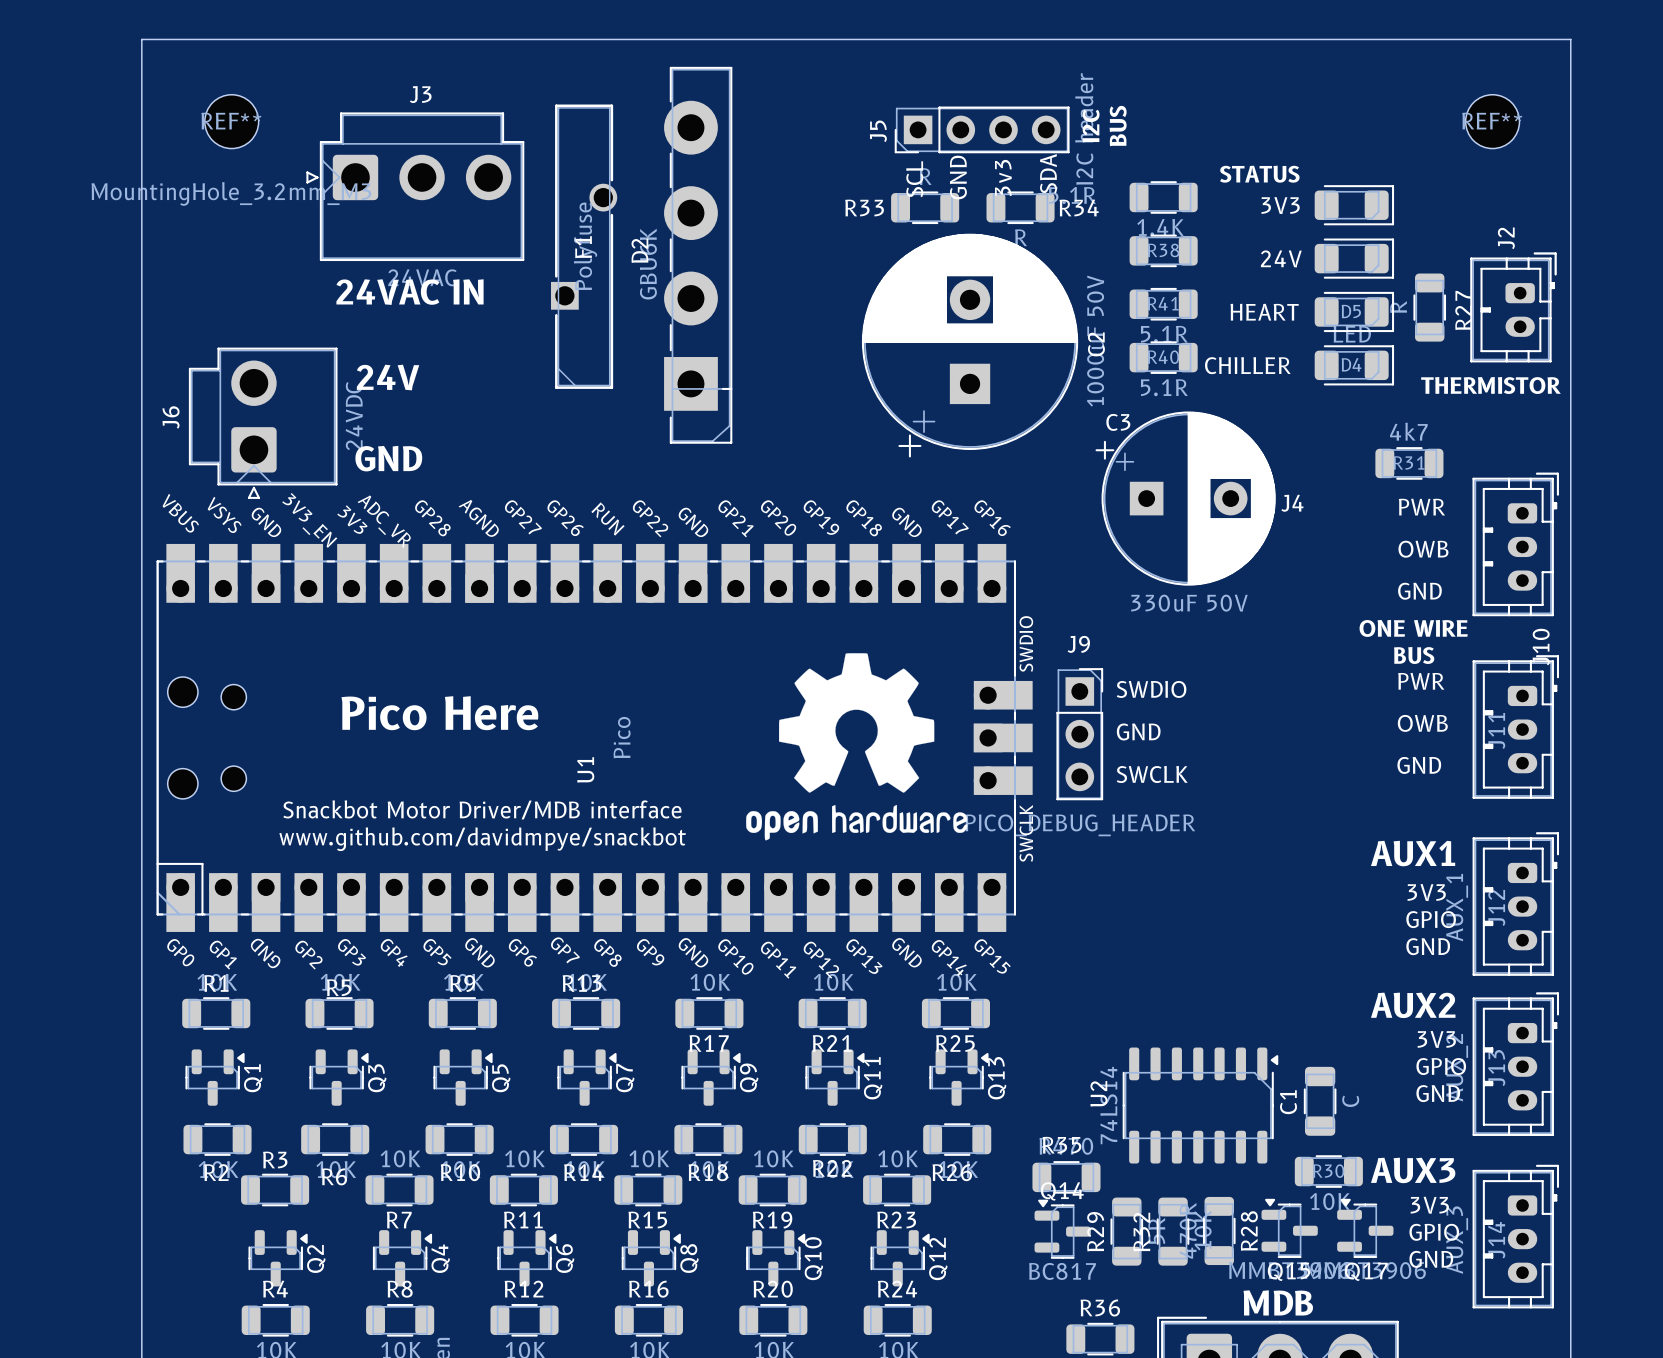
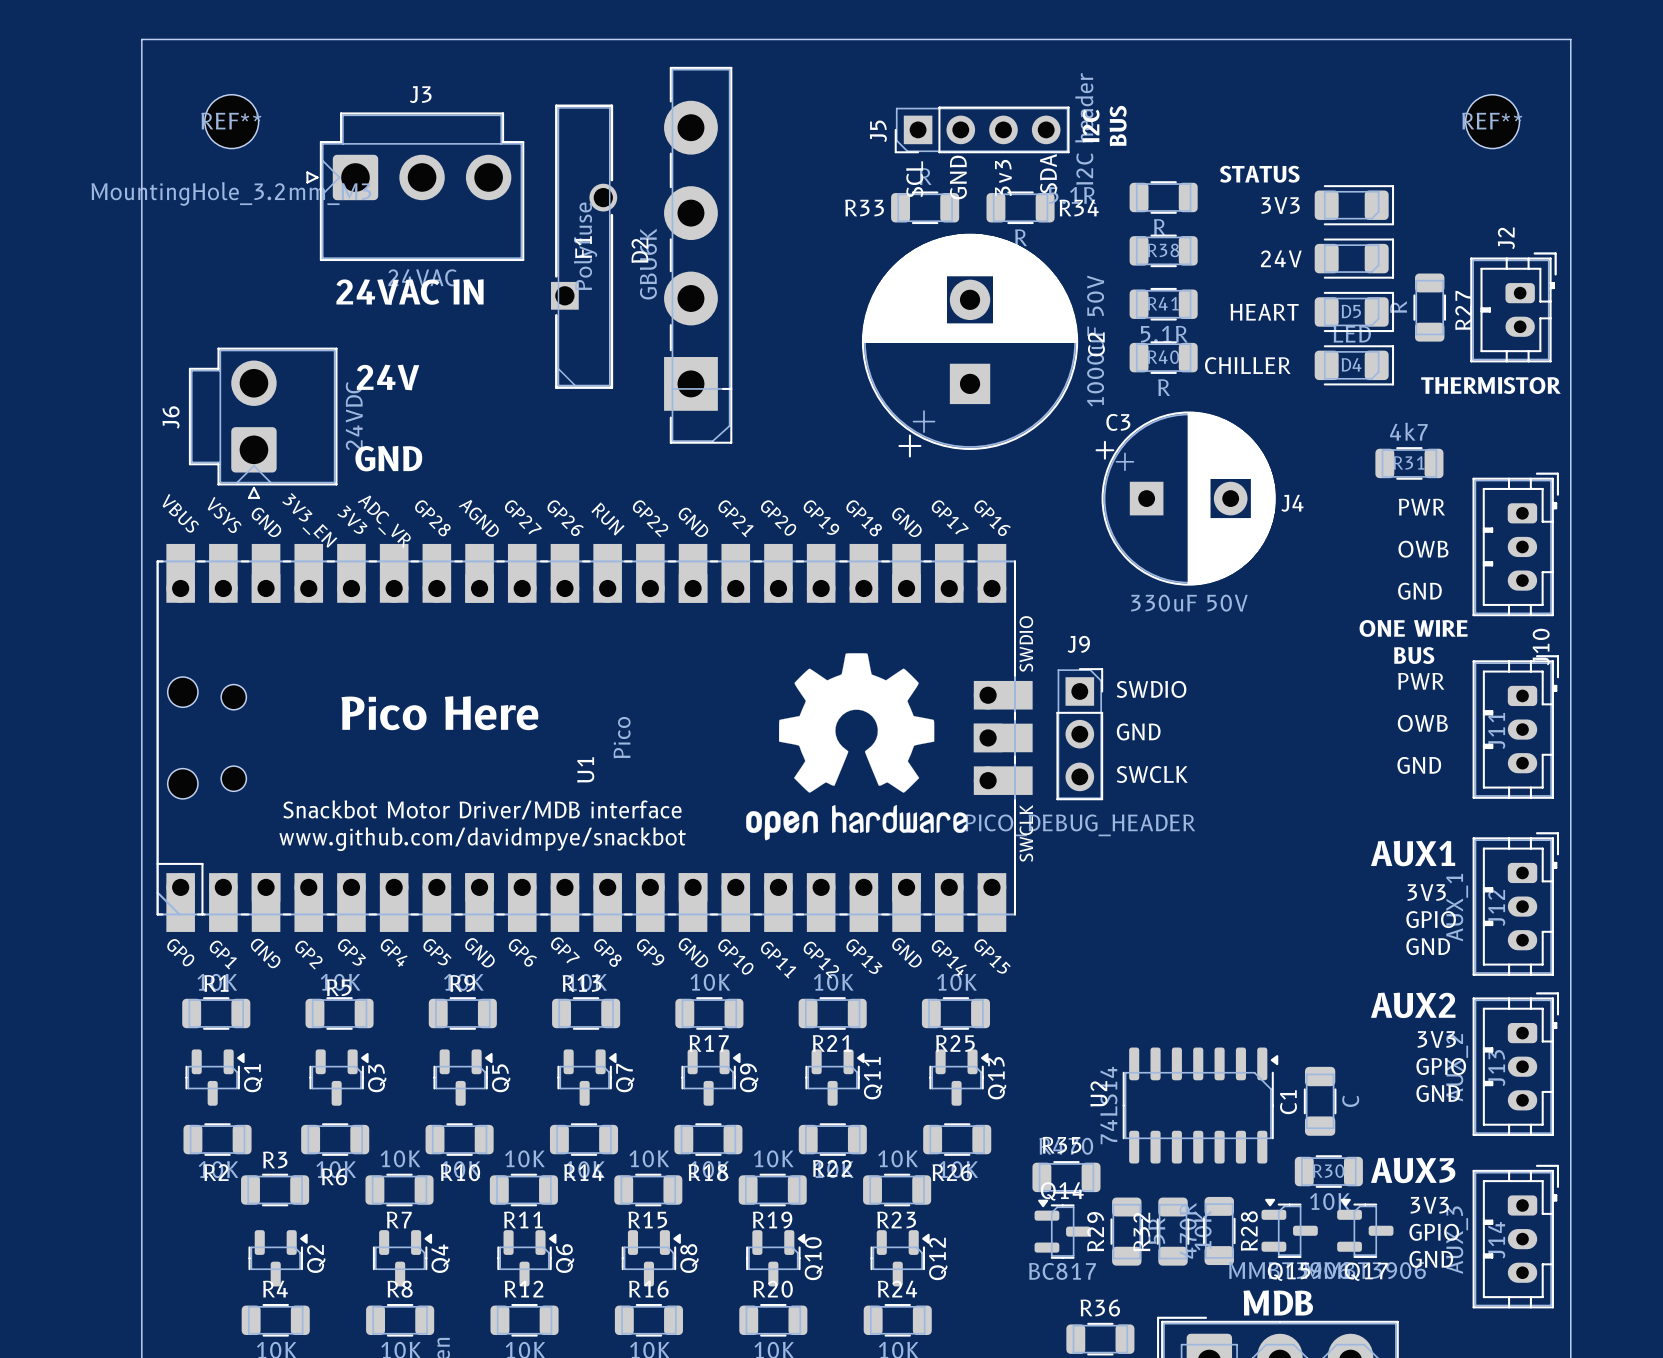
R38 value: 1.4K (1160, 227) -> R (1159, 227)
R40 value: 5.1R (1164, 387) -> R (1164, 387)

